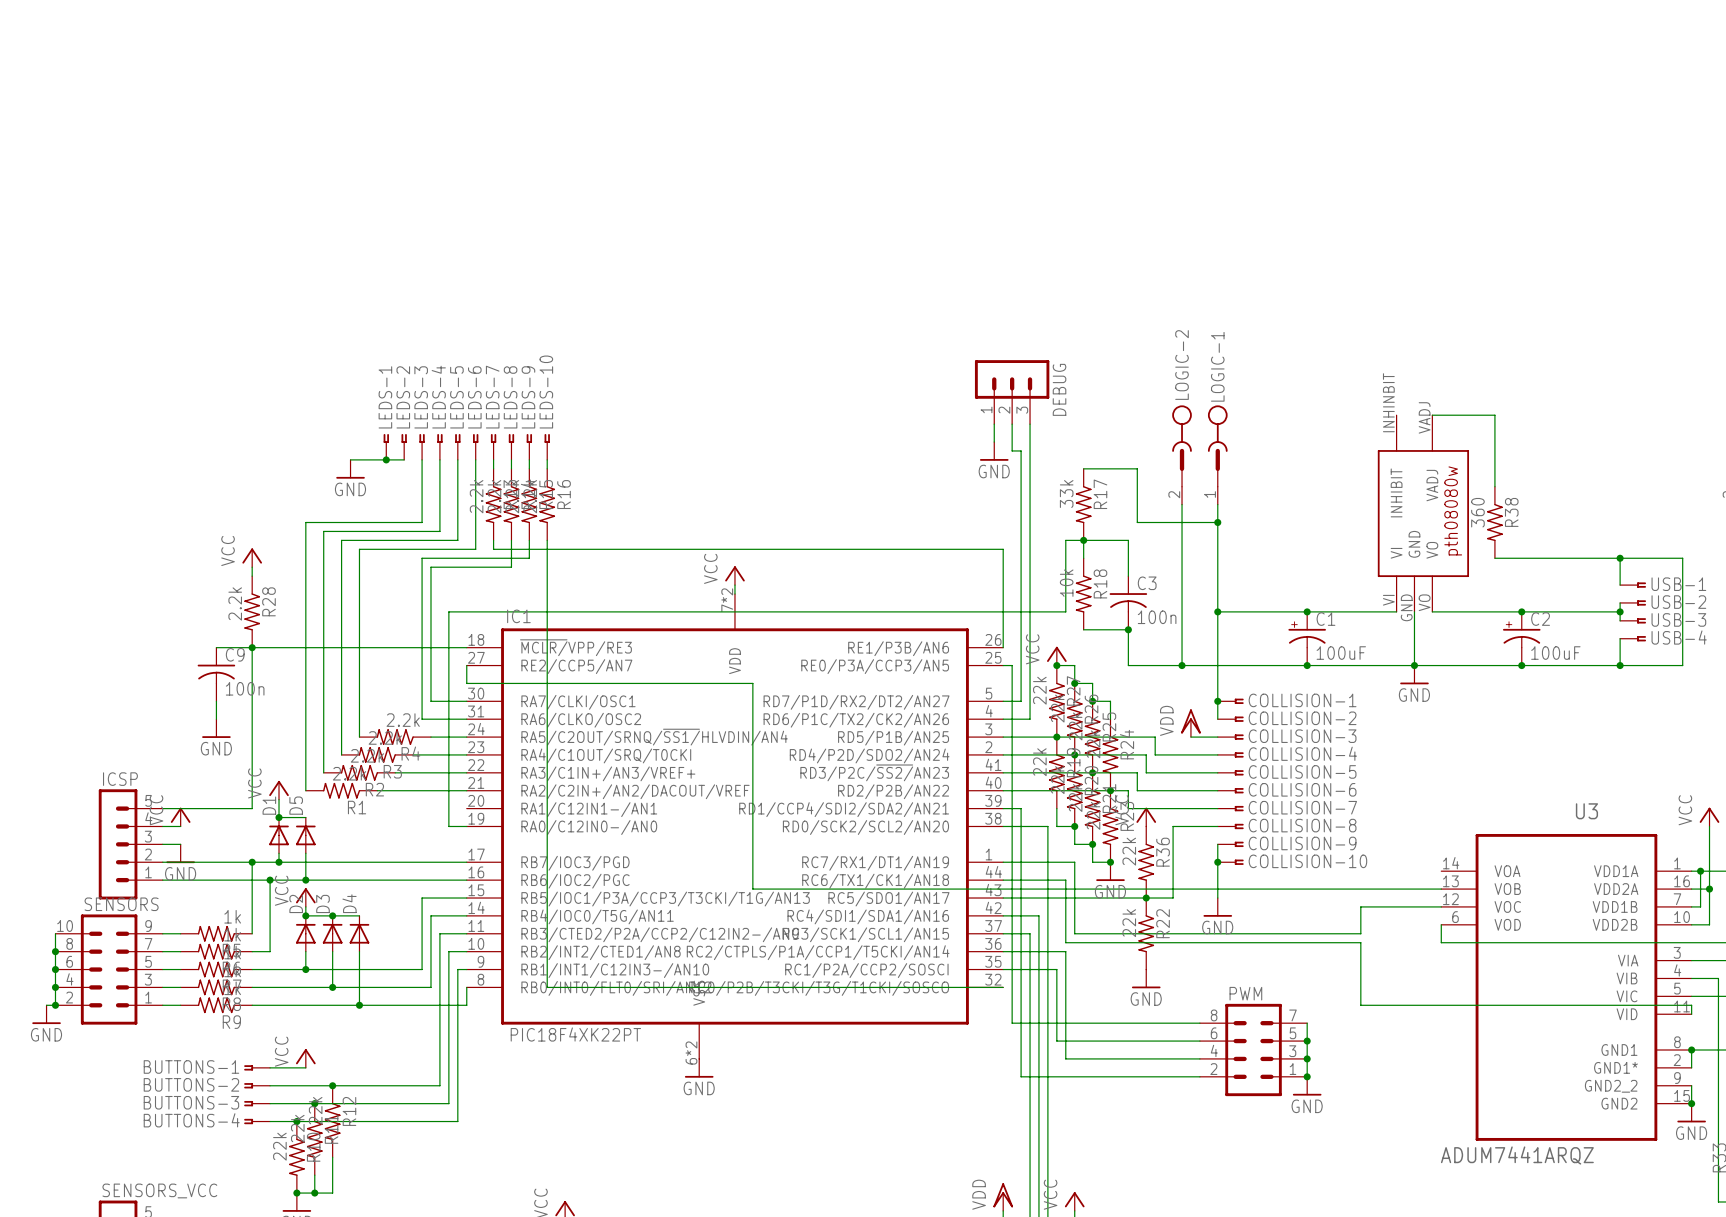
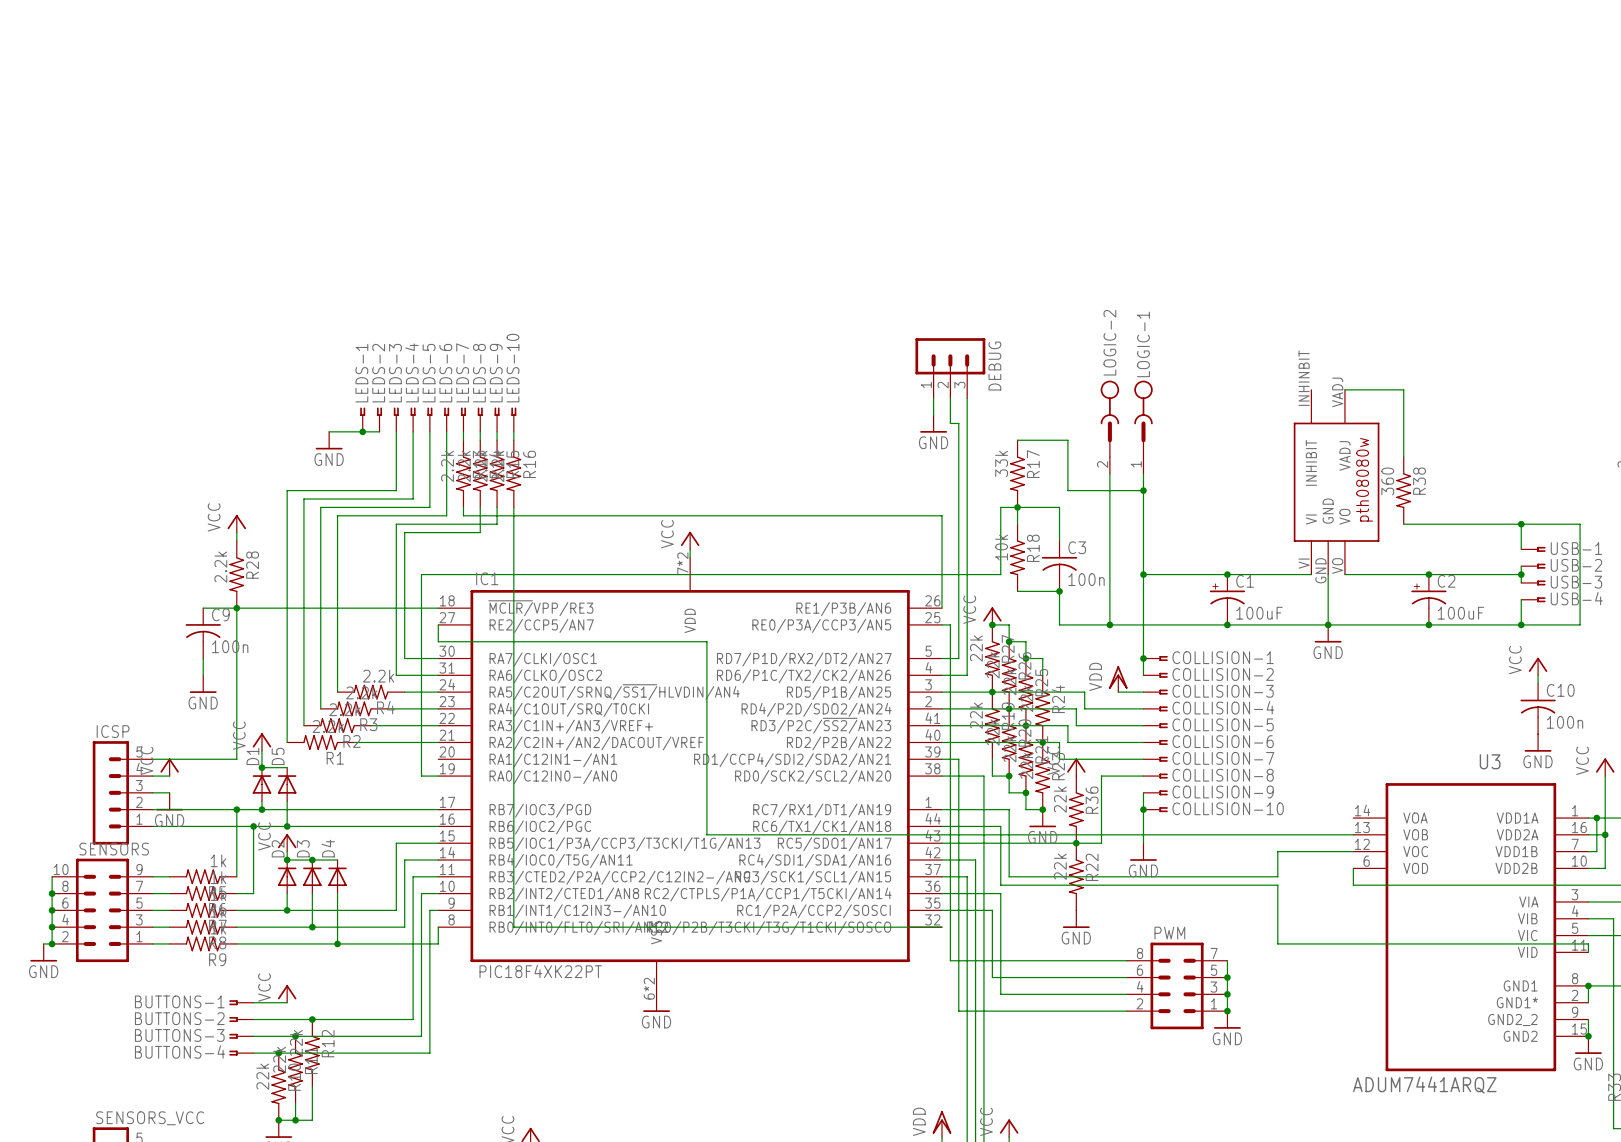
power symbol: none -> VCC (1538, 666)
wire: none -> (1538, 675) (1538, 683)
C10: none -> 100n (1538, 708)
power symbol: none -> GND (1538, 742)

